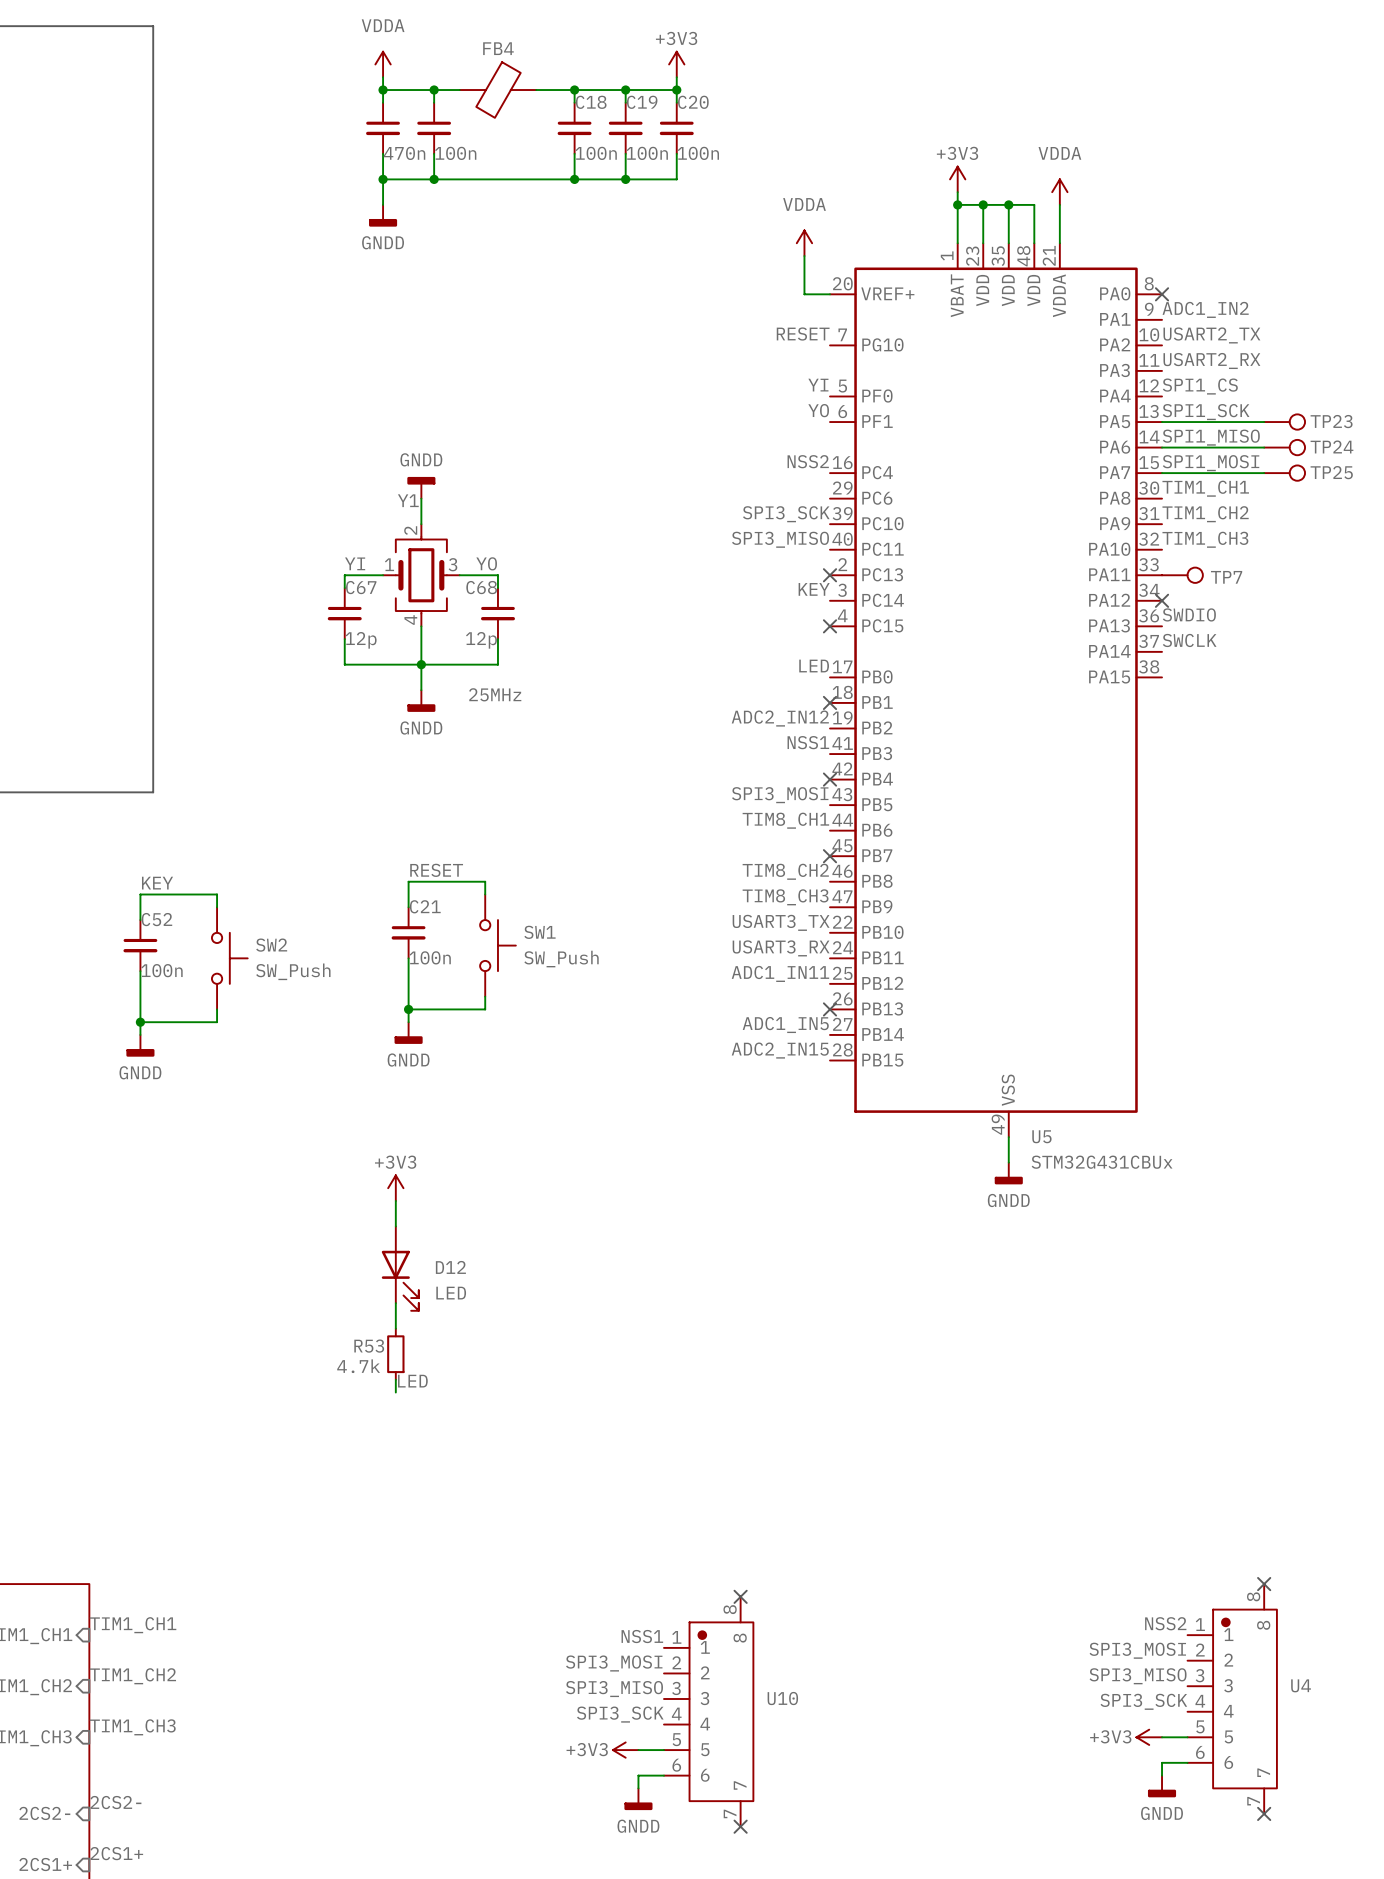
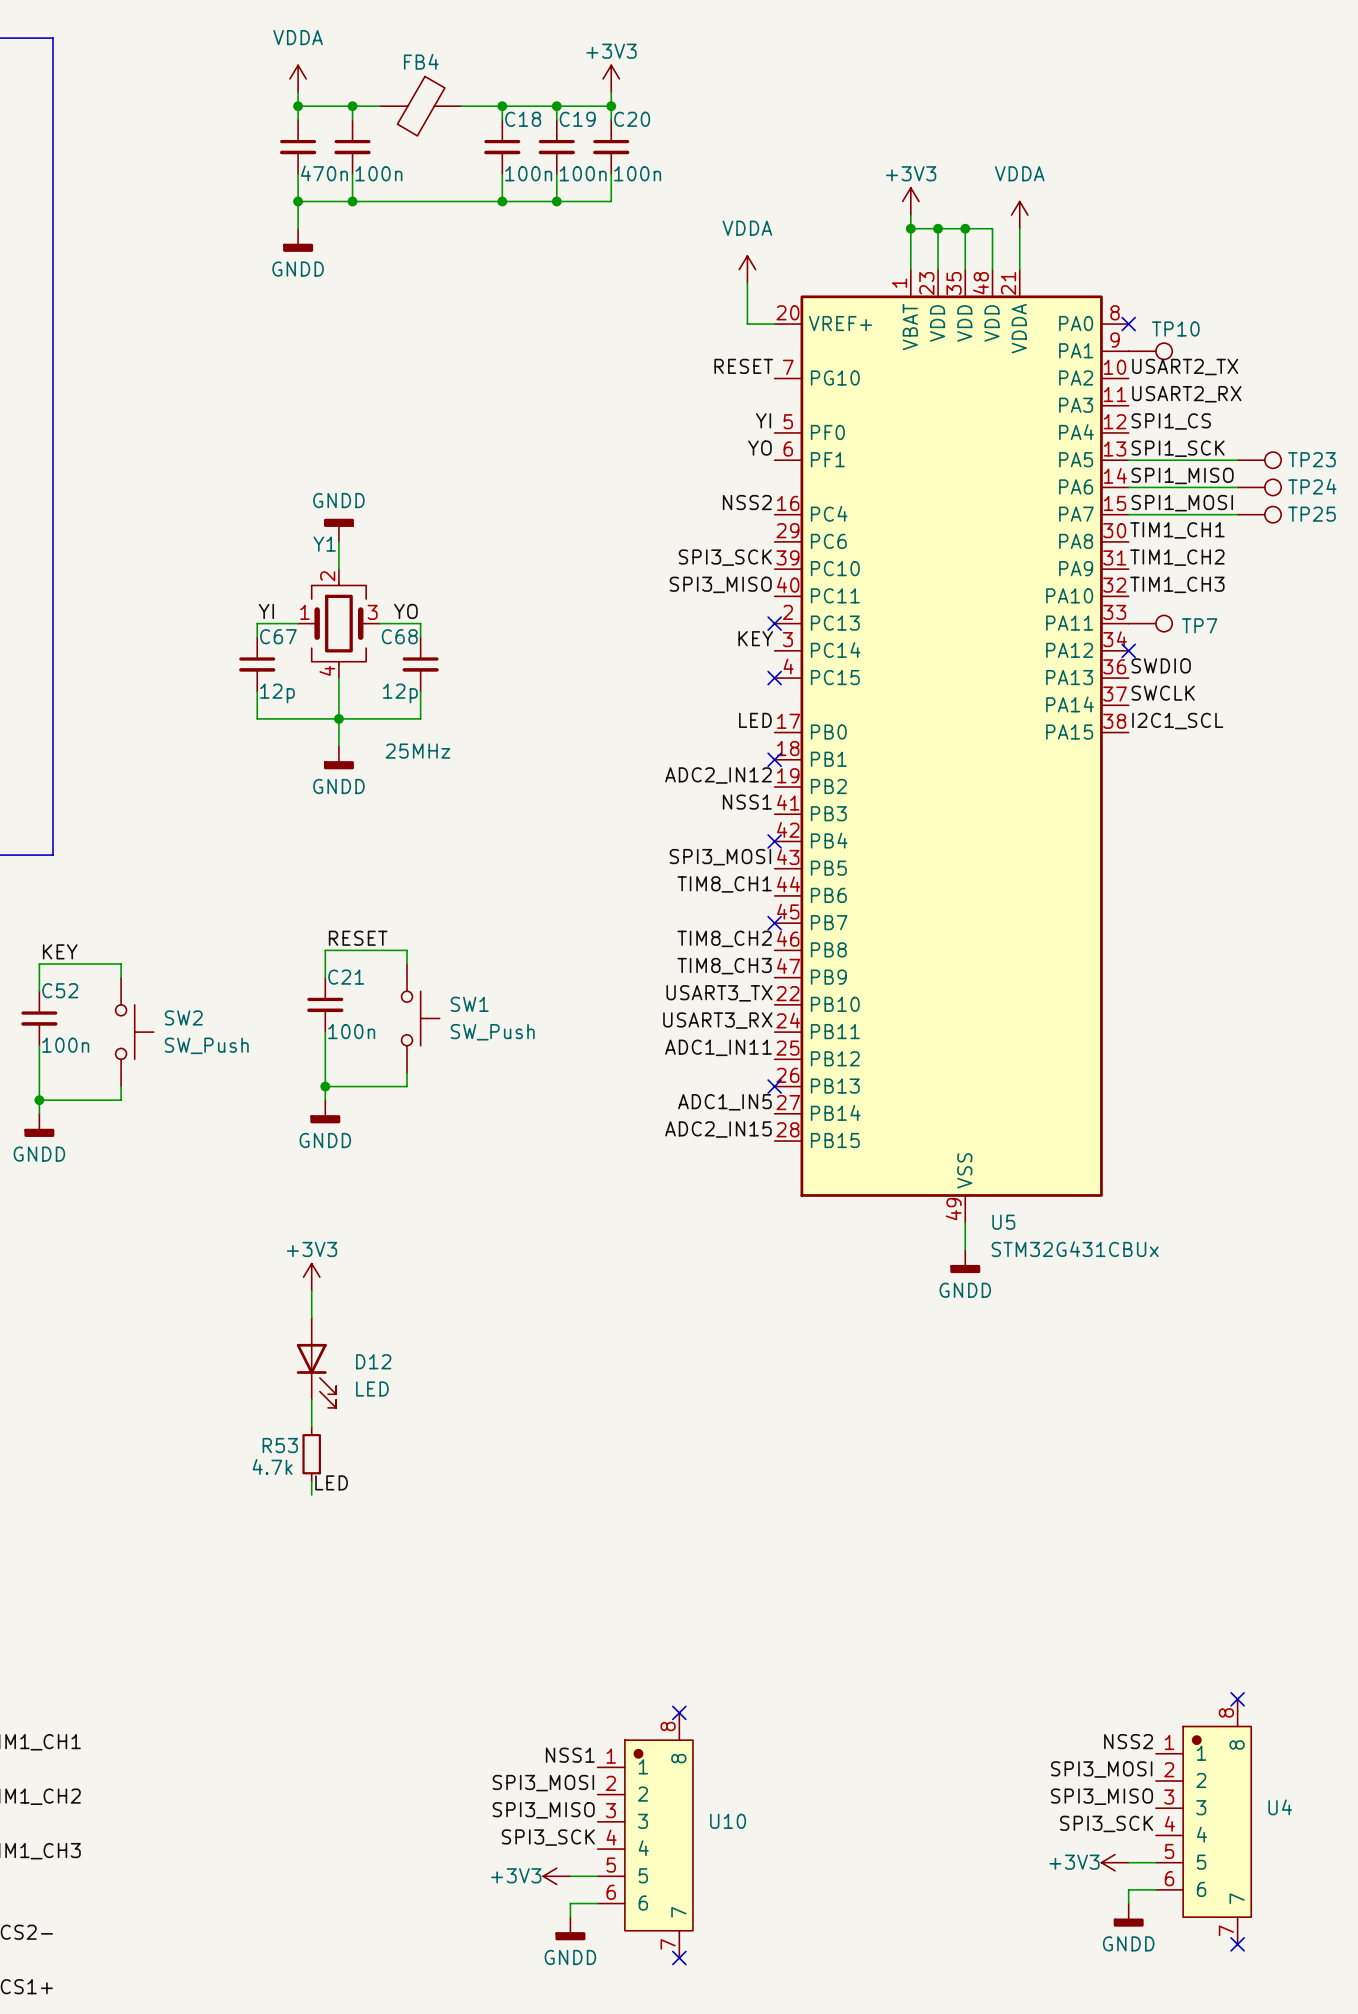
label: ADC1_IN2 (1205, 309) -> none
TP10: none -> (1150, 351)
label: none -> I2C1_SCL (1177, 721)

